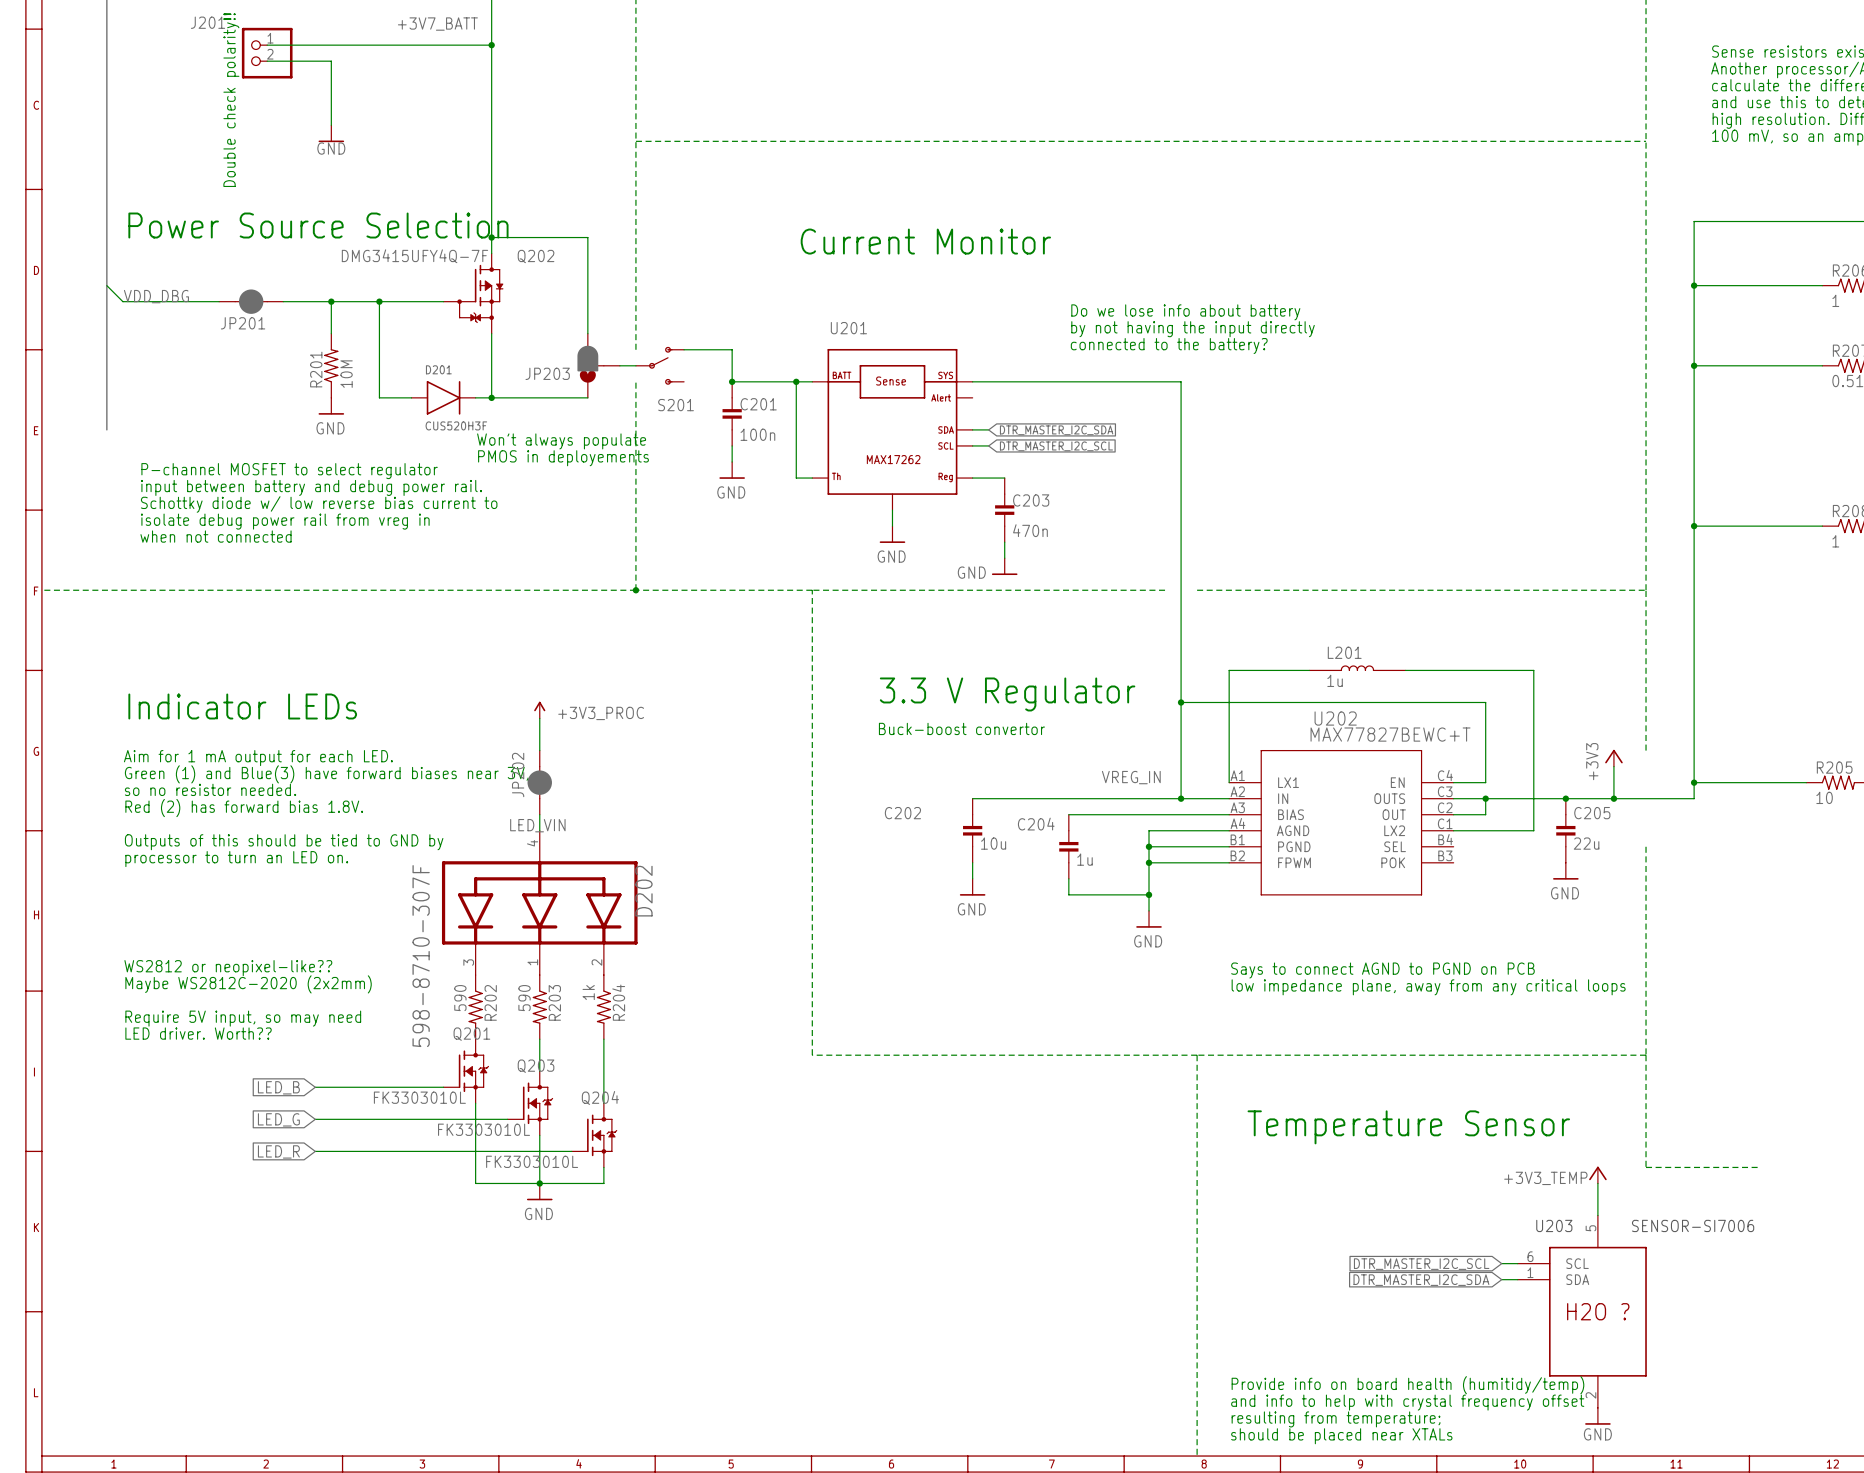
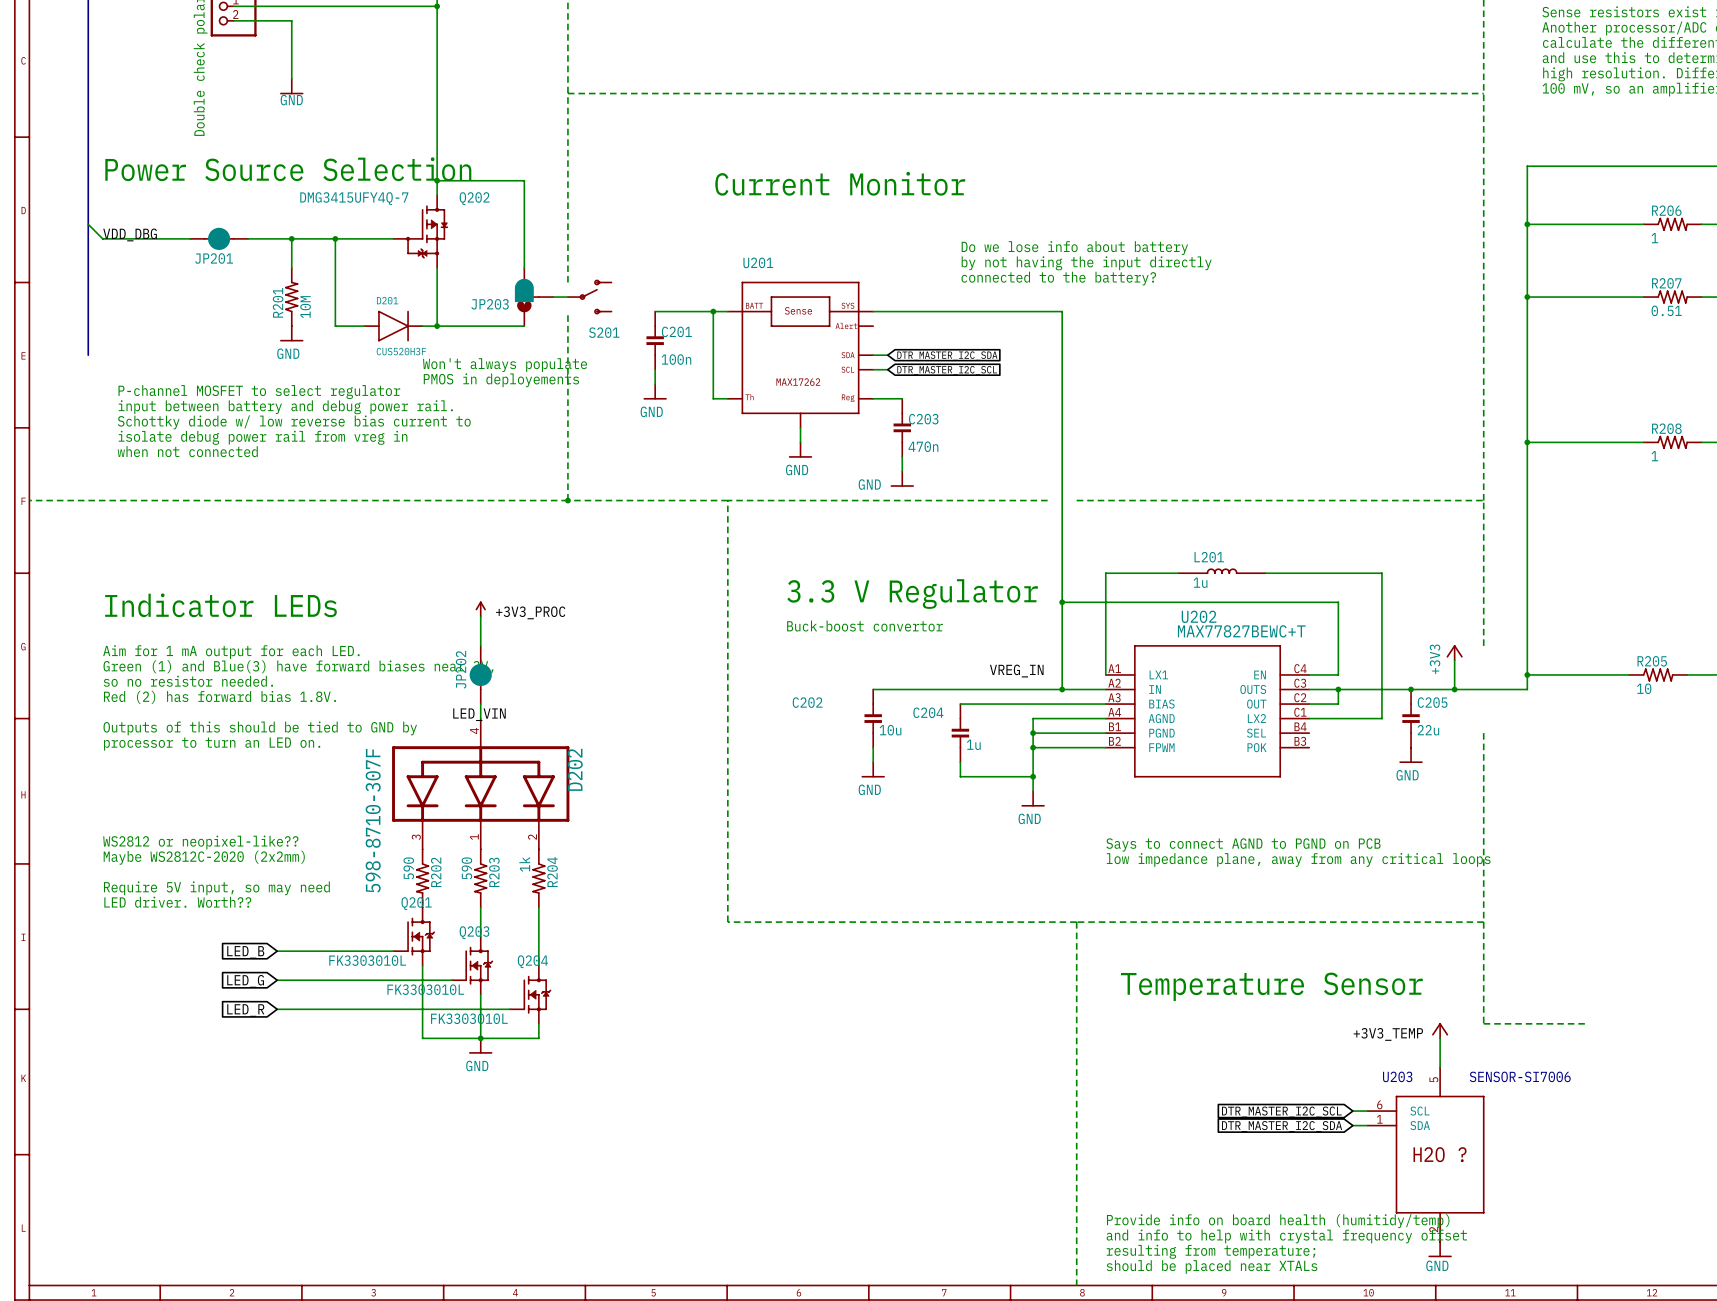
Q202 value: DMG3415UFY4Q-7F (414, 256) -> DMG3415UFY4Q-7 (354, 198)
wire: (684, 349) (732, 349) (732, 381) -> none
junction: (732, 381) -> none

